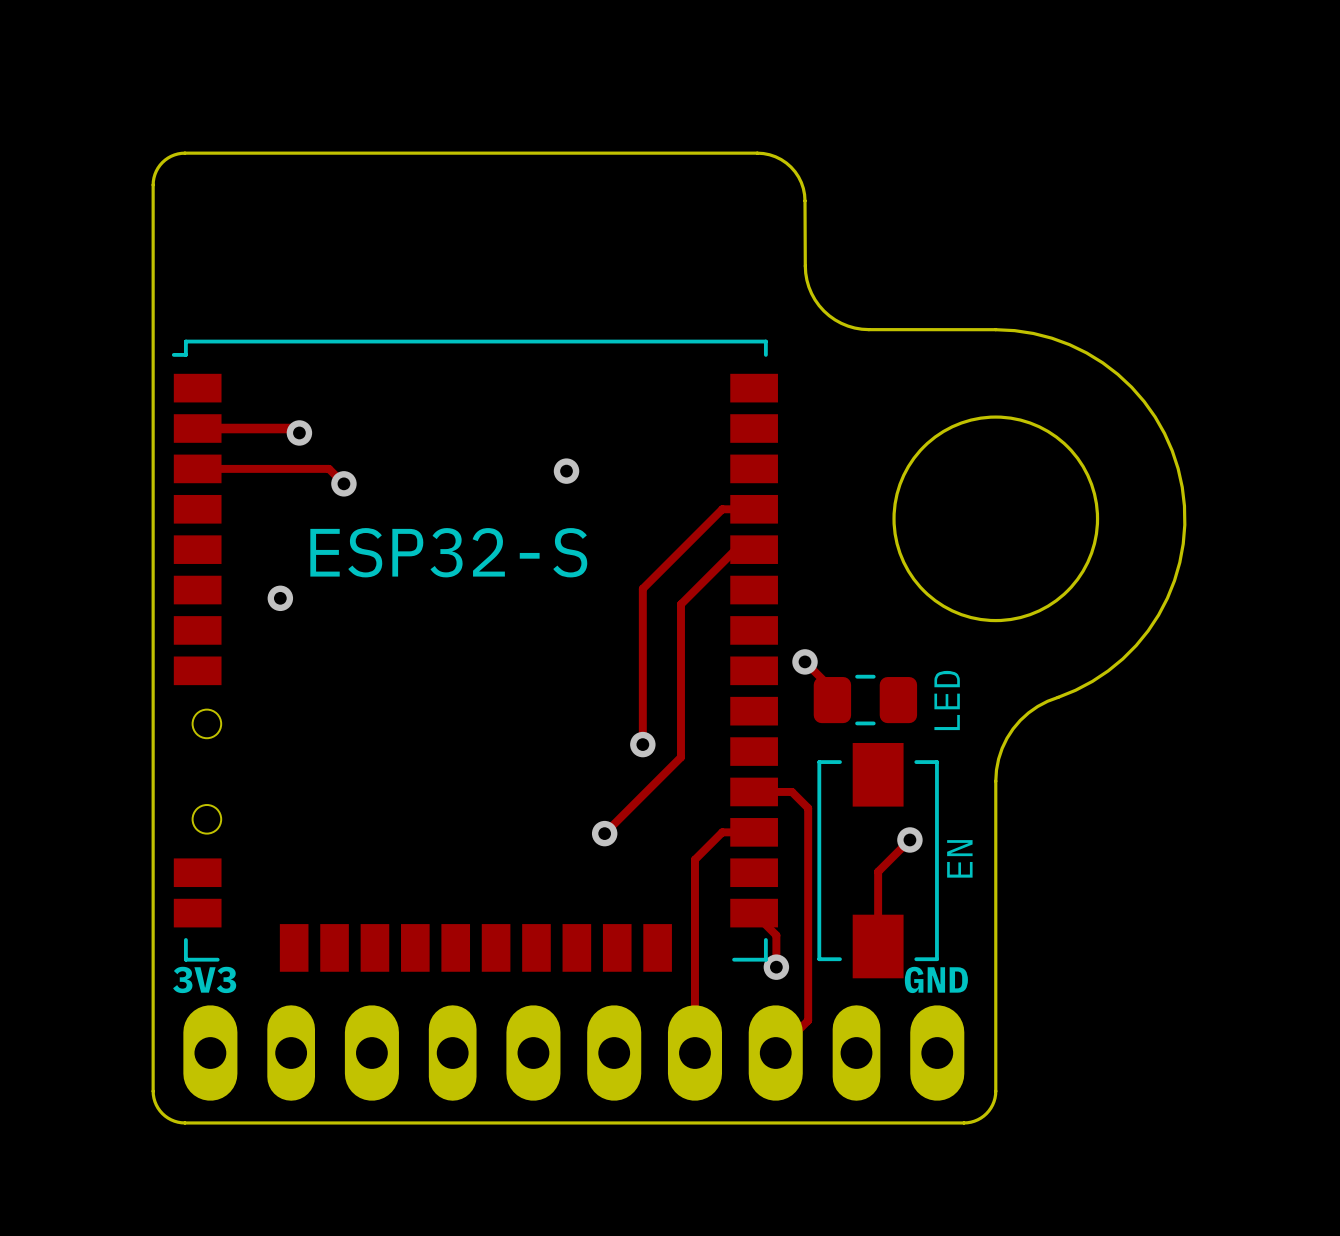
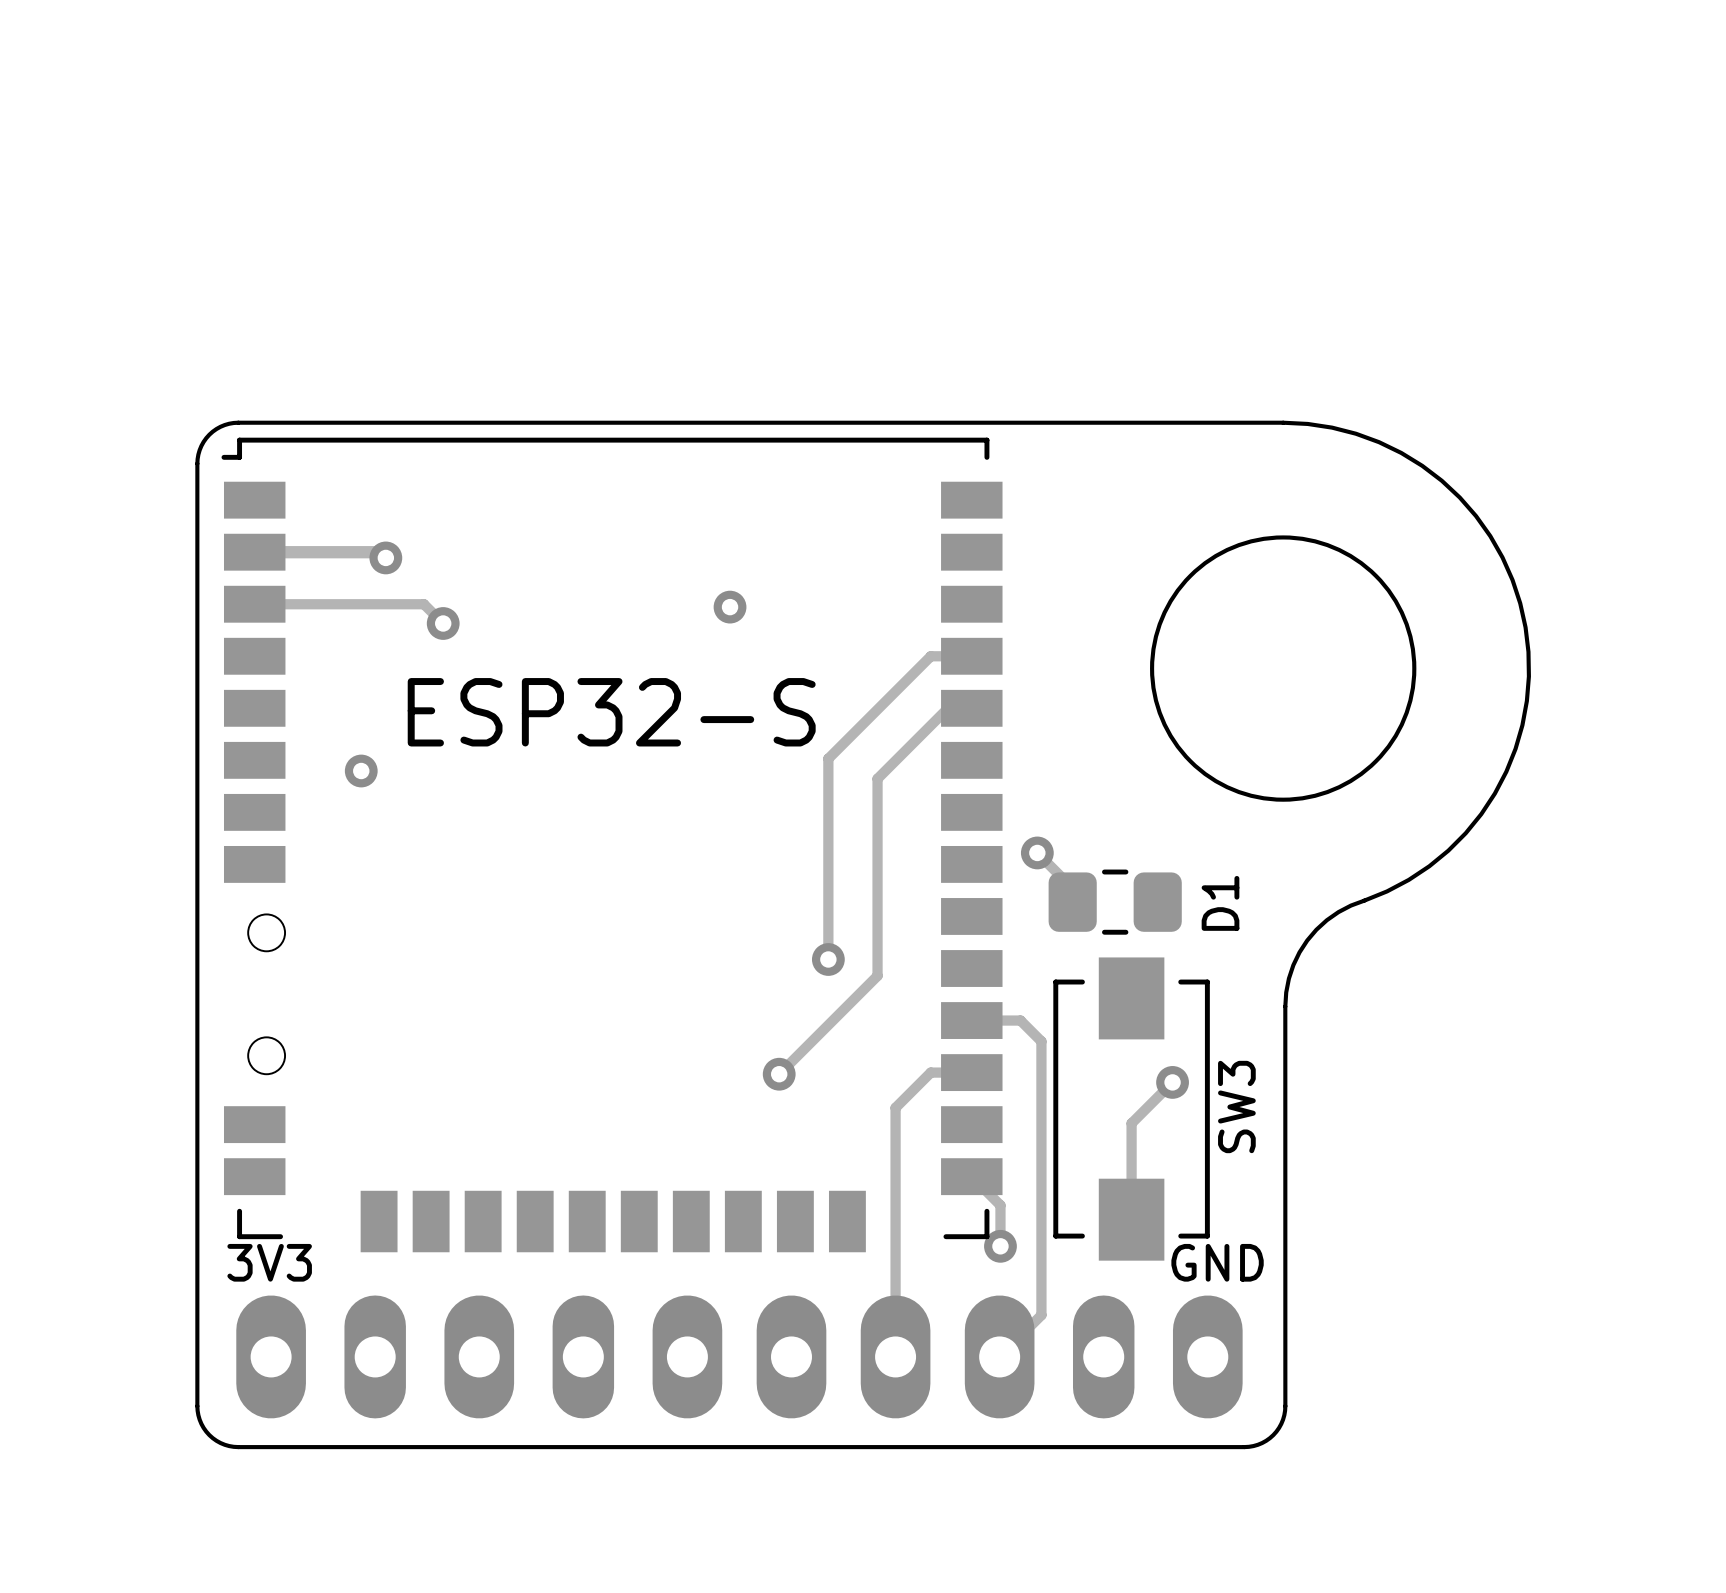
board edge: (153, 359) (153, 181) (160, 165) (174, 154) (184, 153) (757, 153) (775, 156) (786, 163) (795, 171) (801, 182) (804, 200) (806, 280) (815, 299) (823, 311) (835, 319) (847, 326) (861, 329) (995, 329) (1033, 333) (1069, 344) (1086, 352) (1102, 362) (1131, 387) (1155, 416) (1164, 433) (1178, 468) (1184, 506) (1183, 543) (1179, 562) (1167, 598) (1158, 615) (1136, 645) (1108, 670) (1092, 681) (1047, 701) (1028, 712) (1013, 728) (1002, 748) (995, 781) (995, 1094) (990, 1108) (983, 1116) (974, 1121) (963, 1122) -> (197, 463) (199, 450) (209, 434) (224, 425) (238, 422) (1283, 422) (1332, 427) (1379, 442) (1422, 465) (1459, 497) (1490, 536) (1512, 580) (1520, 603) (1525, 627) (1528, 676) (1522, 725) (1506, 771) (1481, 814) (1465, 833) (1429, 866) (1408, 879) (1387, 891) (1351, 905) (1326, 920) (1307, 940) (1293, 965) (1288, 978) (1285, 1006) (1285, 1410) (1279, 1427) (1269, 1438) (1257, 1444) (1242, 1447)
LED name: LED (947, 700) -> D1 (1220, 903)
EN name: EN (959, 858) -> SW3 (1236, 1107)

